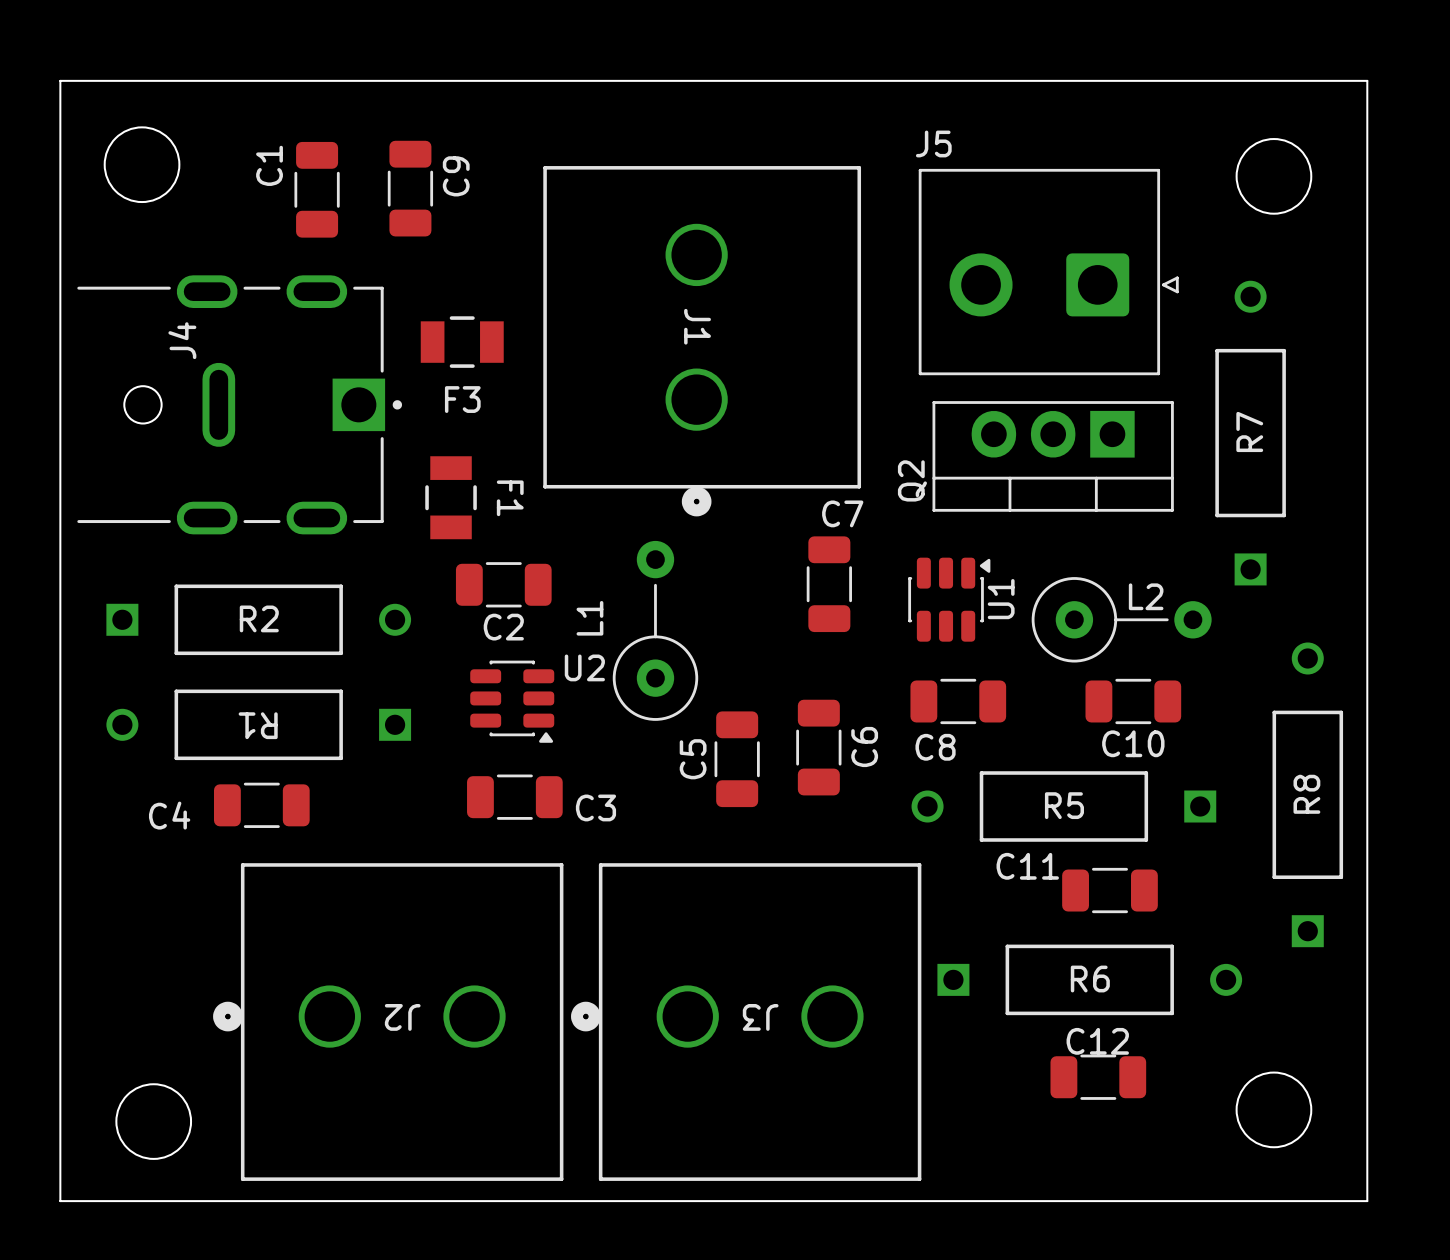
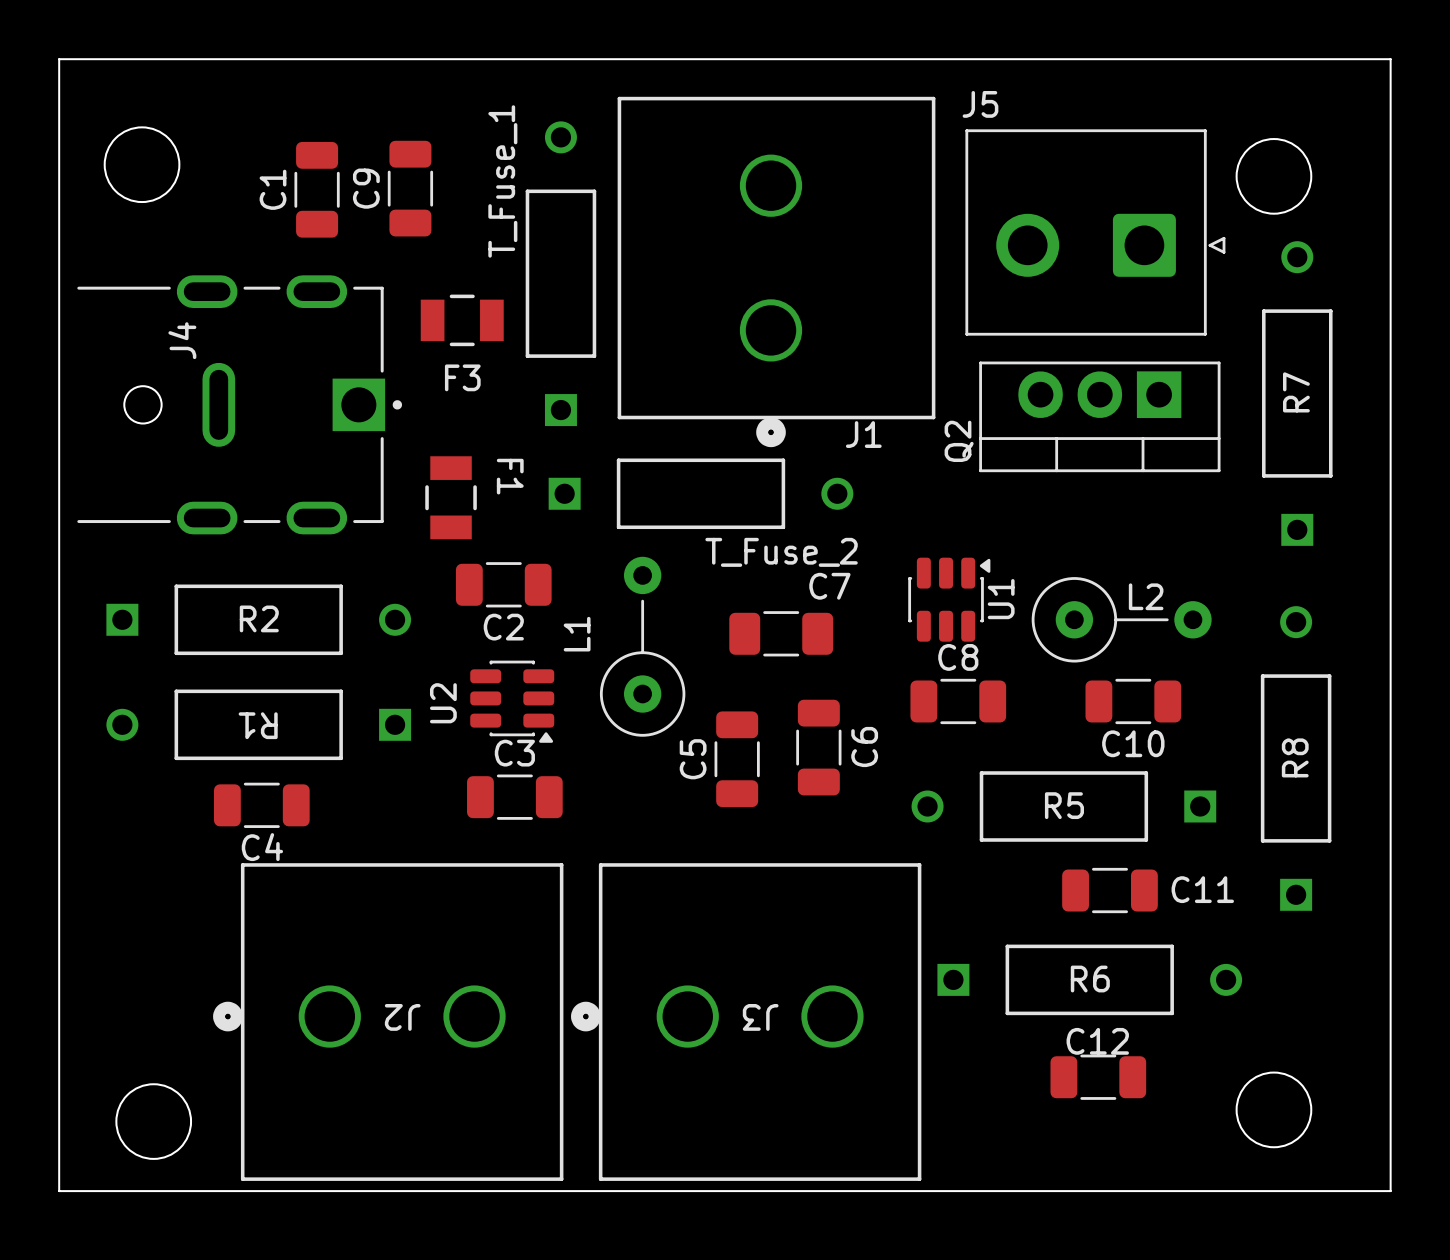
board edge: (60, 80) (1367, 80) (1367, 1201) (60, 1201) (60, 80) -> (59, 59) (59, 1191) (1390, 1191) (1390, 59) (59, 59)
C1 name position: C1 (269, 165) -> C1 (273, 189)
C9 name position: C9 (456, 176) -> C9 (366, 188)
J5 position: (1048, 272) -> (1095, 232)
T_Fuse_1: none -> (560, 273)
J1 name rotation: 0° (697, 326) -> 90° counterclockwise (863, 434)
J1 name position: J1 (697, 326) -> J1 (863, 434)
J1 position: (702, 341) -> (776, 271)
F3 position: (462, 342) -> (462, 320)
R7 position: (1250, 433) -> (1297, 393)
Q2 position: (1053, 456) -> (1099, 416)
T_Fuse_2: none -> (700, 493)
F1 name position: F1 (510, 498) -> F1 (510, 476)
C7 footprint: [806, 536, 852, 633] -> [729, 611, 834, 657]
L1 position: (655, 630) -> (642, 646)
U2 name rotation: 0° (584, 667) -> 90° counterclockwise (443, 703)
U2 name position: U2 (584, 667) -> U2 (443, 703)
C8 name position: C8 (935, 747) -> C8 (958, 657)
R8 position: (1307, 794) -> (1296, 758)
C3 name position: C3 (595, 807) -> C3 (514, 753)
C4 name position: C4 (169, 815) -> C4 (262, 847)
C11 name position: C11 (1027, 866) -> C11 (1202, 889)

